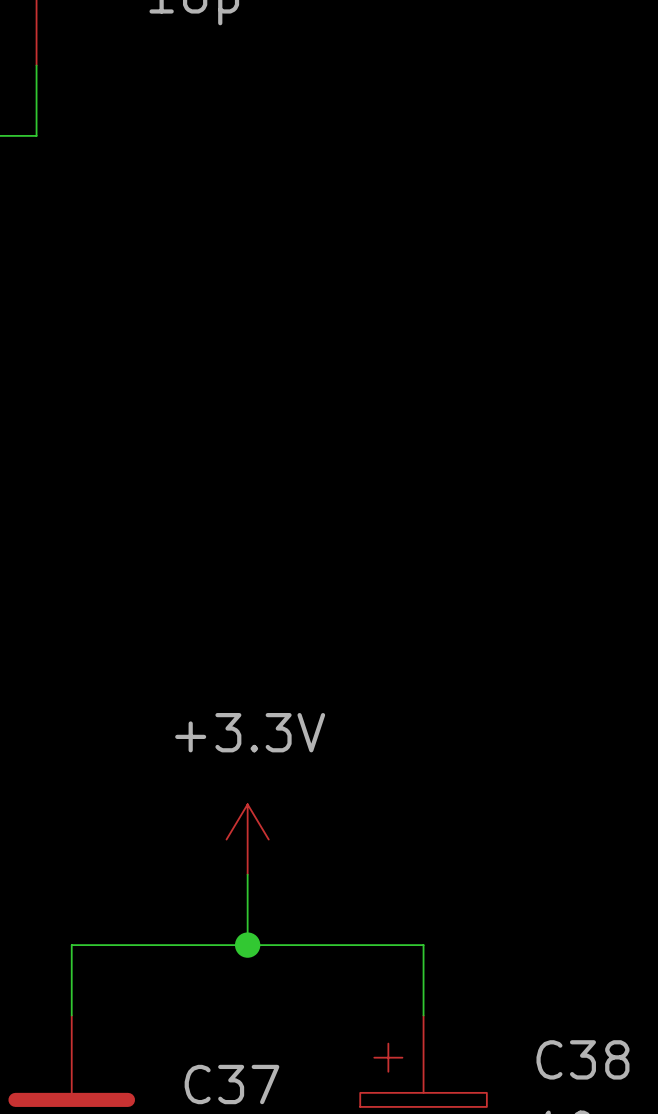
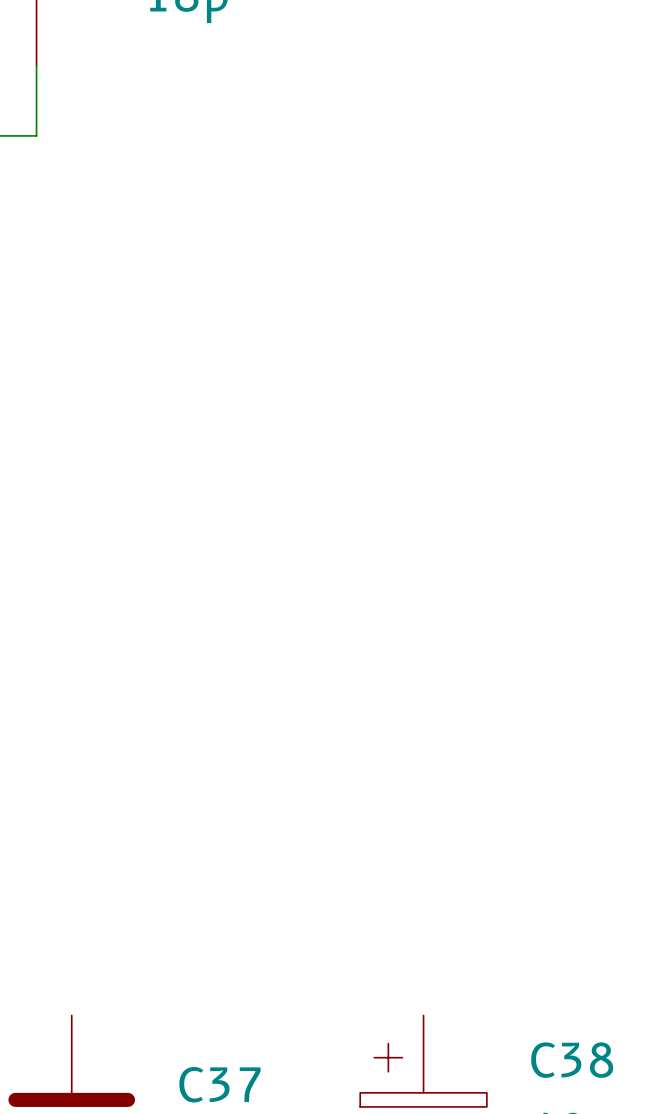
power symbol: +3.3V (247, 839) -> none
wire: (247, 874) (247, 945) -> none
junction: (247, 945) -> none
wire: (71, 1015) (71, 945) (423, 945) (423, 1015) -> none

